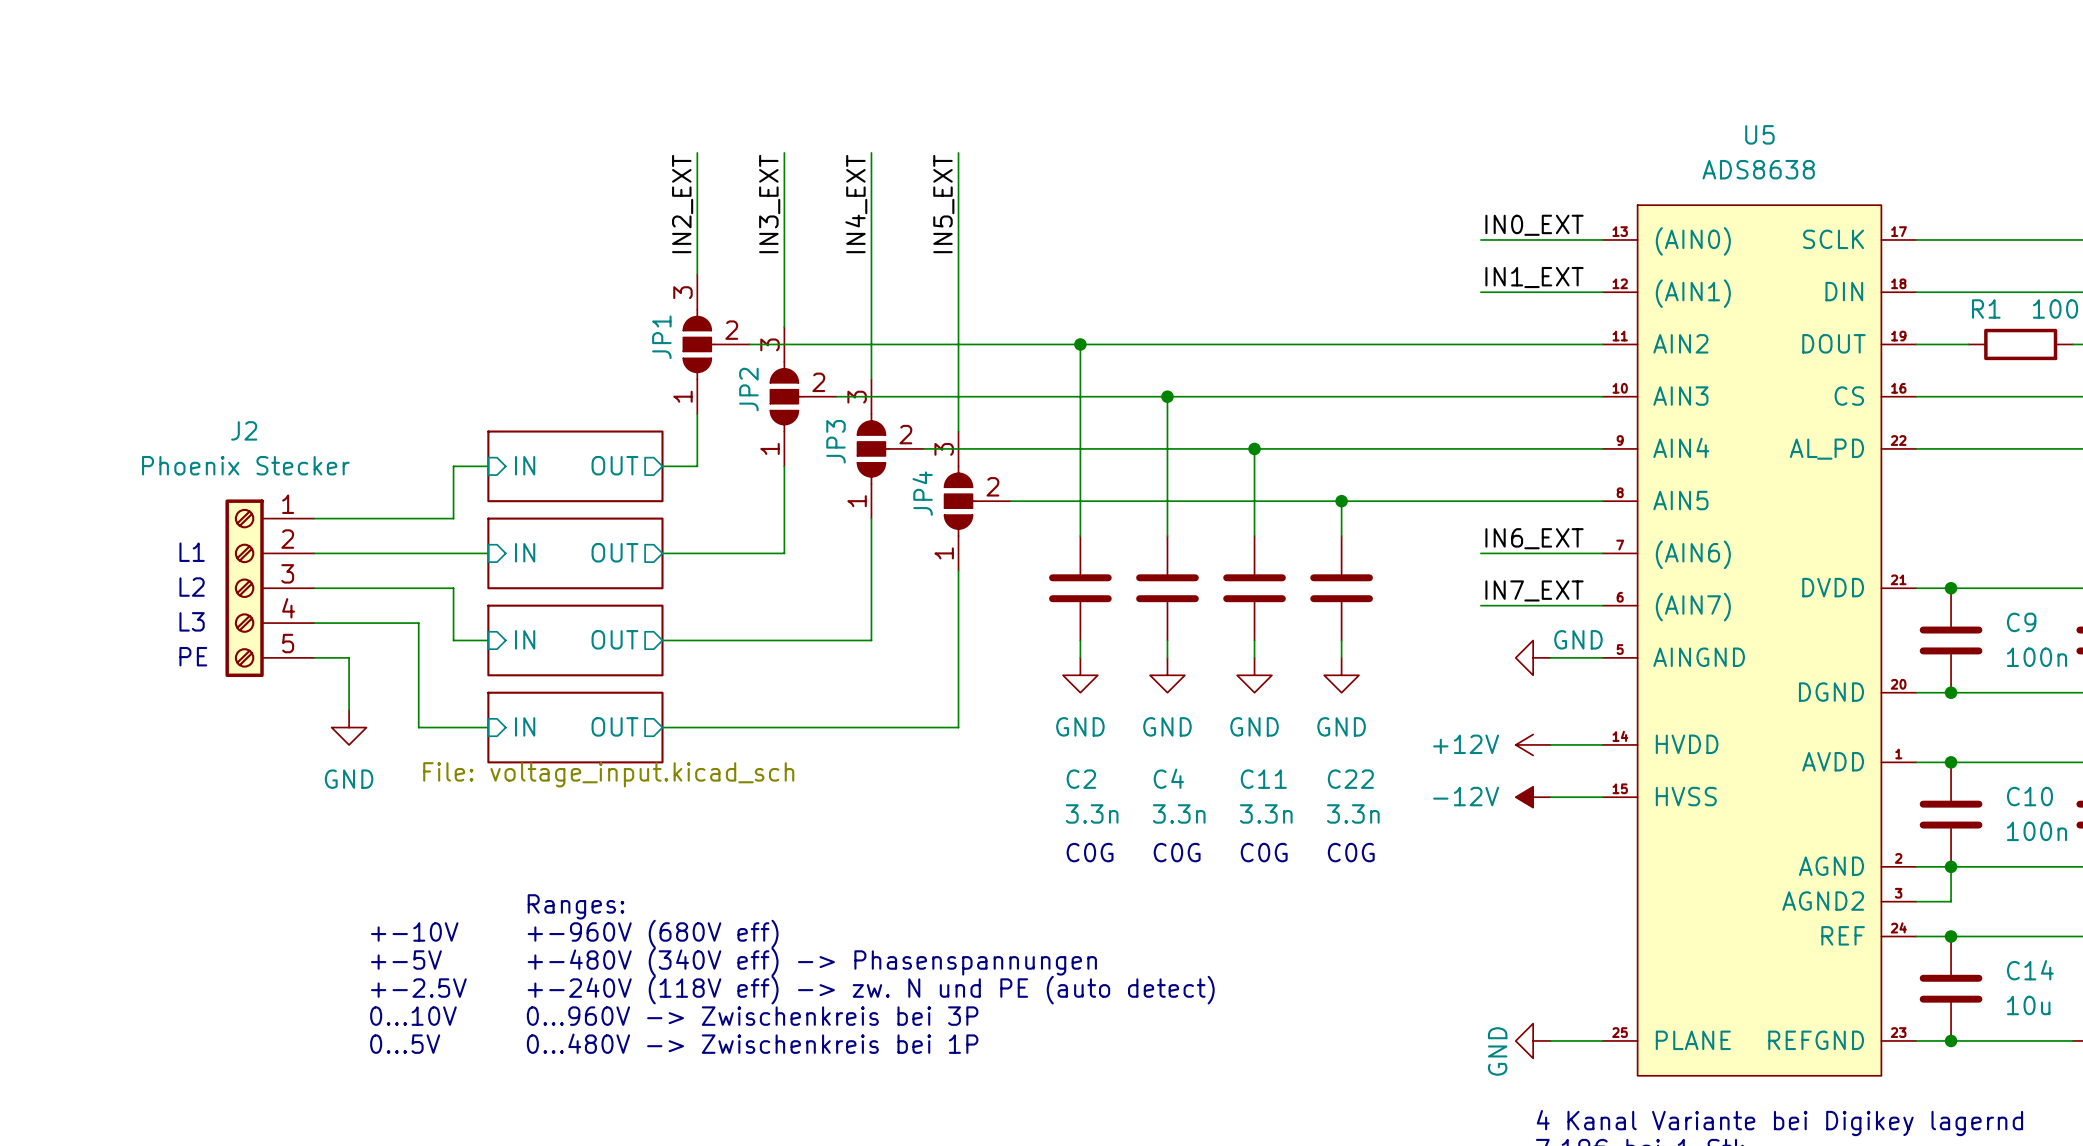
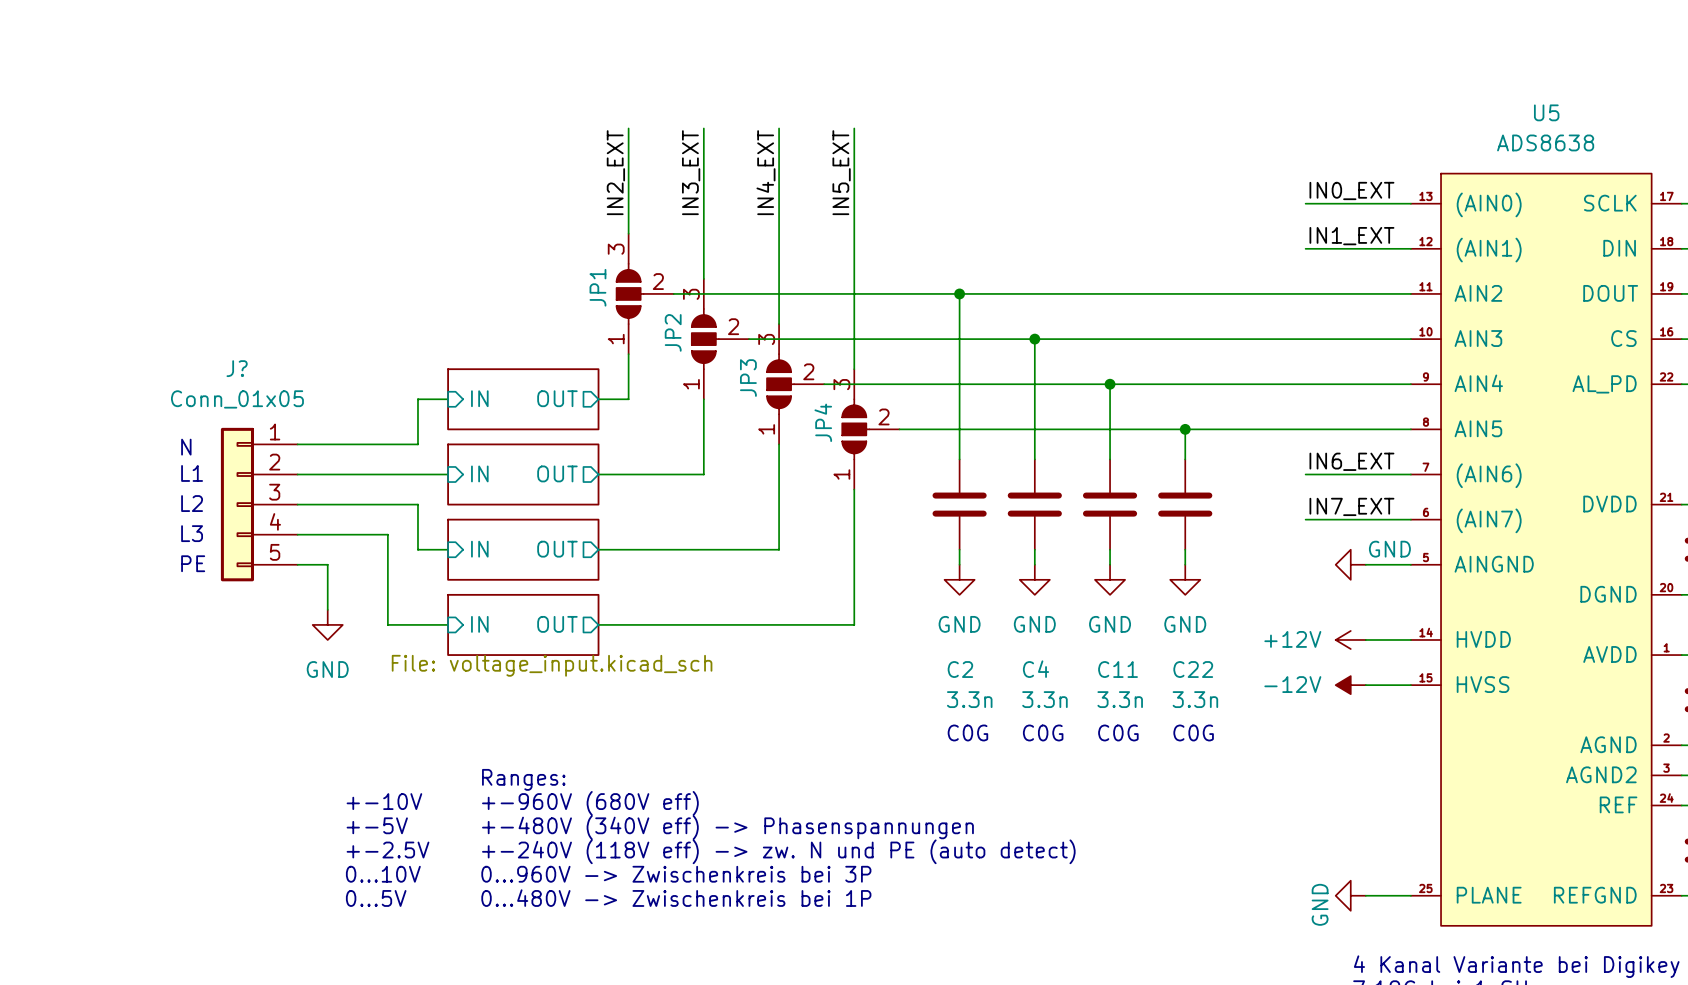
text: none -> N (186, 447)
J2: Phoenix Stecker (269, 588) -> none
J?: none -> Conn_01x05 (259, 504)

